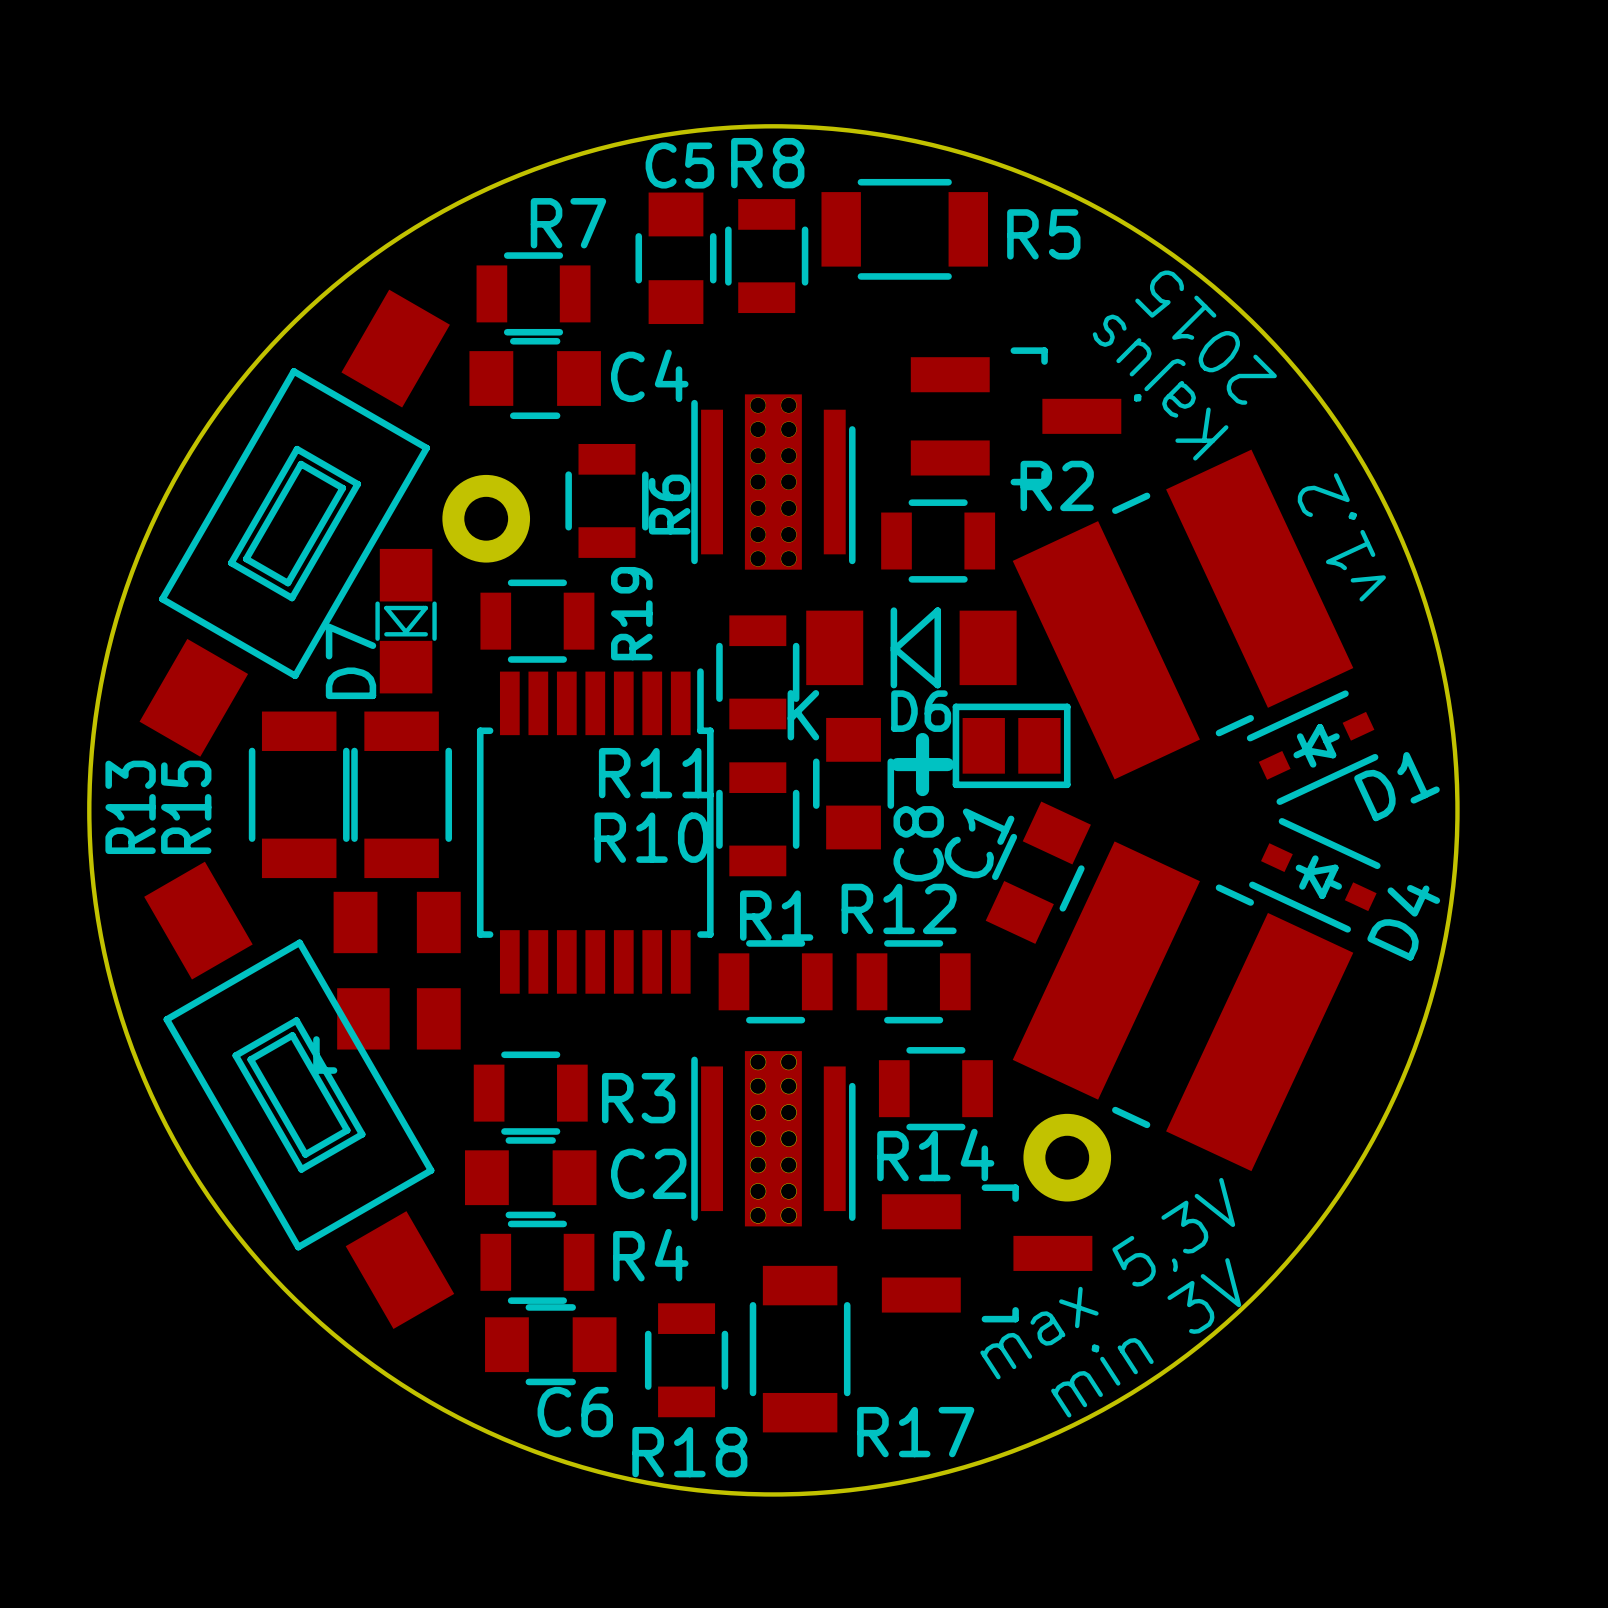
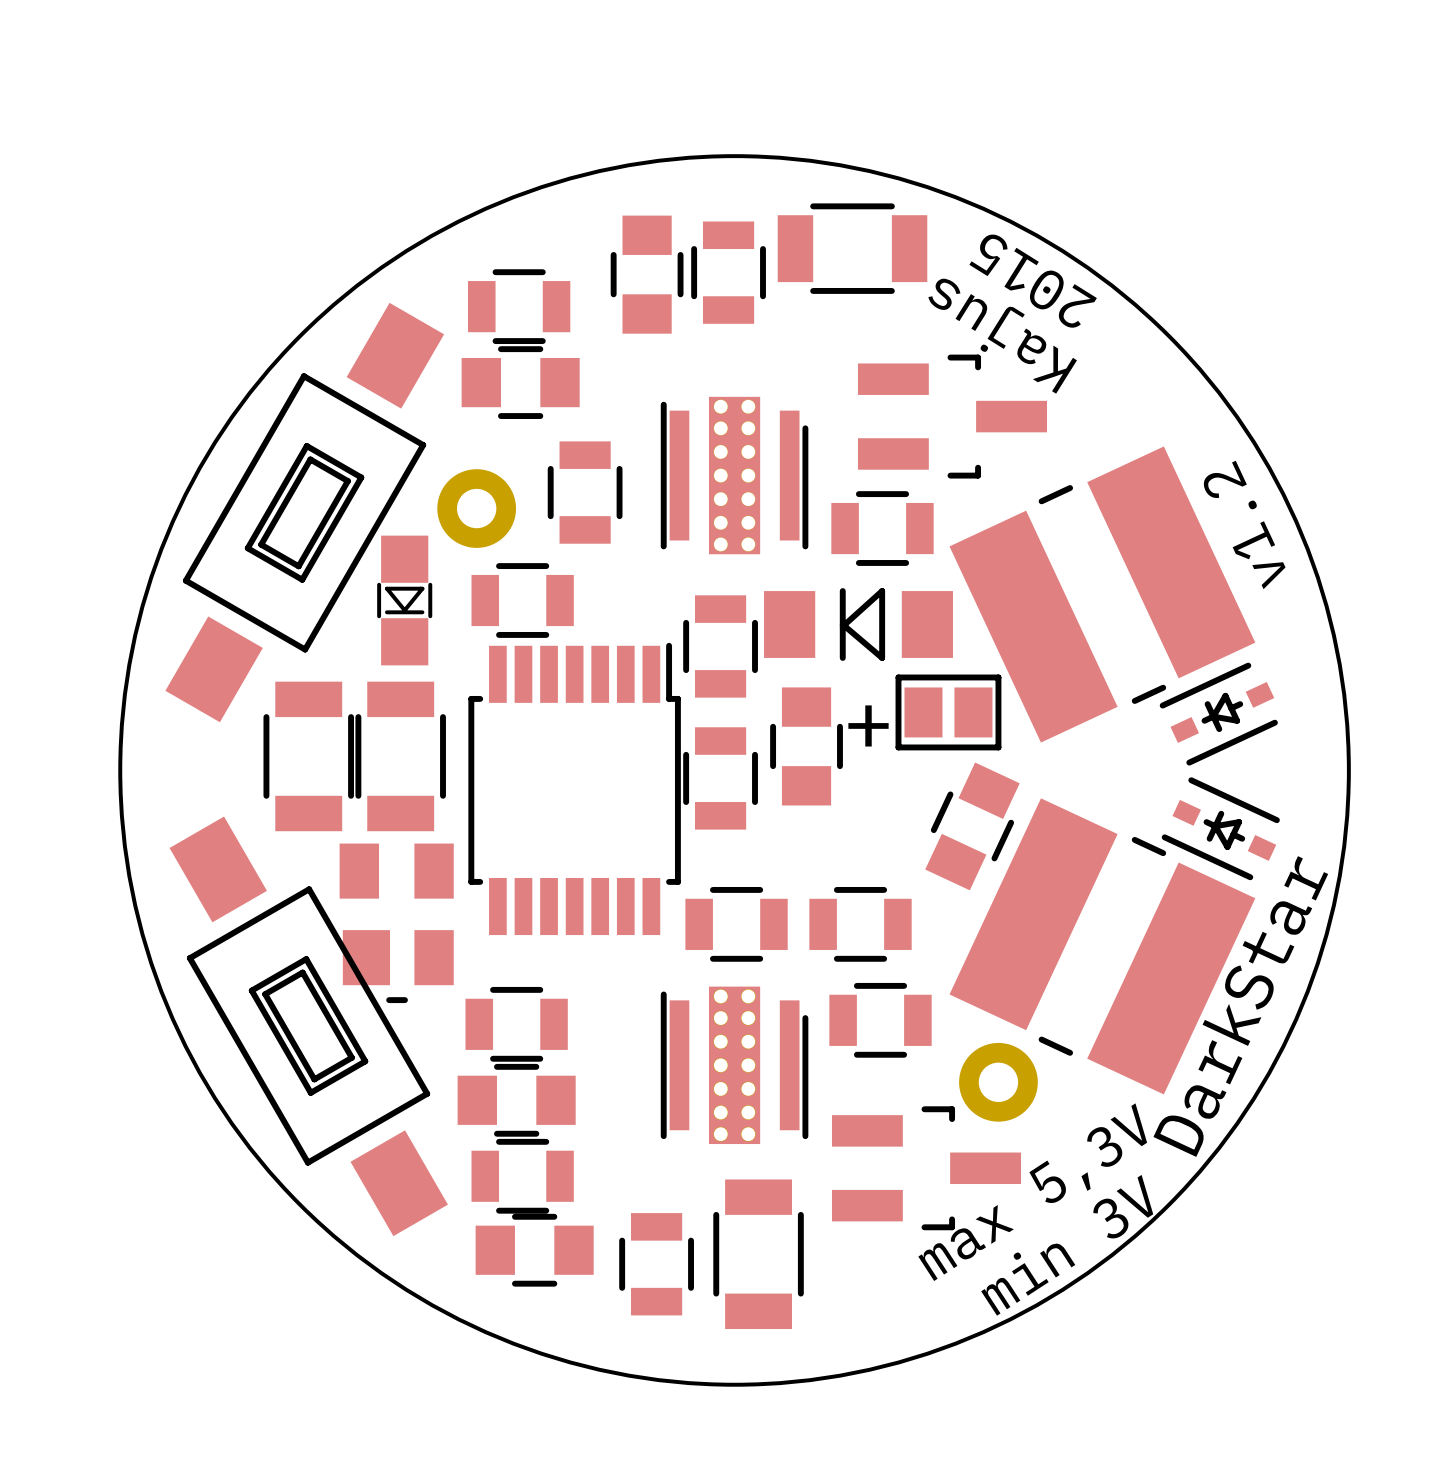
R8 name: R8 (767, 163) -> none
C5 name: C5 (679, 165) -> none
R7 name: R7 (568, 223) -> none
R5 name: R5 (1043, 234) -> none
text rotation: 0° (1206, 337) -> 13° counterclockwise (1033, 281)
C4 name: C4 (649, 375) -> none
text rotation: 0° (1160, 387) -> 13° counterclockwise (1002, 336)
R2 name: R2 (1057, 485) -> none
R6 name: R6 (669, 504) -> none
R19 name: R19 (631, 613) -> none
D7 name: D7 (350, 661) -> none
D6 name: D6 (921, 711) -> none
D6 text: K (803, 715) -> none
R11 name: R11 (656, 773) -> none
D1 name: D1 (1396, 786) -> none
R13 name: R13 (130, 807) -> none
R15 name: R15 (186, 807) -> none
R10 name: R10 (651, 837) -> none
C8 name: C8 (918, 843) -> none
C1 name: C1 (979, 843) -> none
part footprint: [313, 891, 461, 1074] -> [339, 843, 454, 1004]
R12 name: R12 (899, 908) -> none
R1 name: R1 (776, 915) -> none
D4 name: D4 (1403, 922) -> none
text: none -> DarkStar (1240, 1006)
R3 name: R3 (638, 1098) -> none
R14 name: R14 (935, 1155) -> none
C2 name: C2 (648, 1173) -> none
R4 name: R4 (650, 1255) -> none
C6 name: C6 (575, 1412) -> none
R17 name: R17 (915, 1432) -> none
R18 name: R18 (689, 1452) -> none

